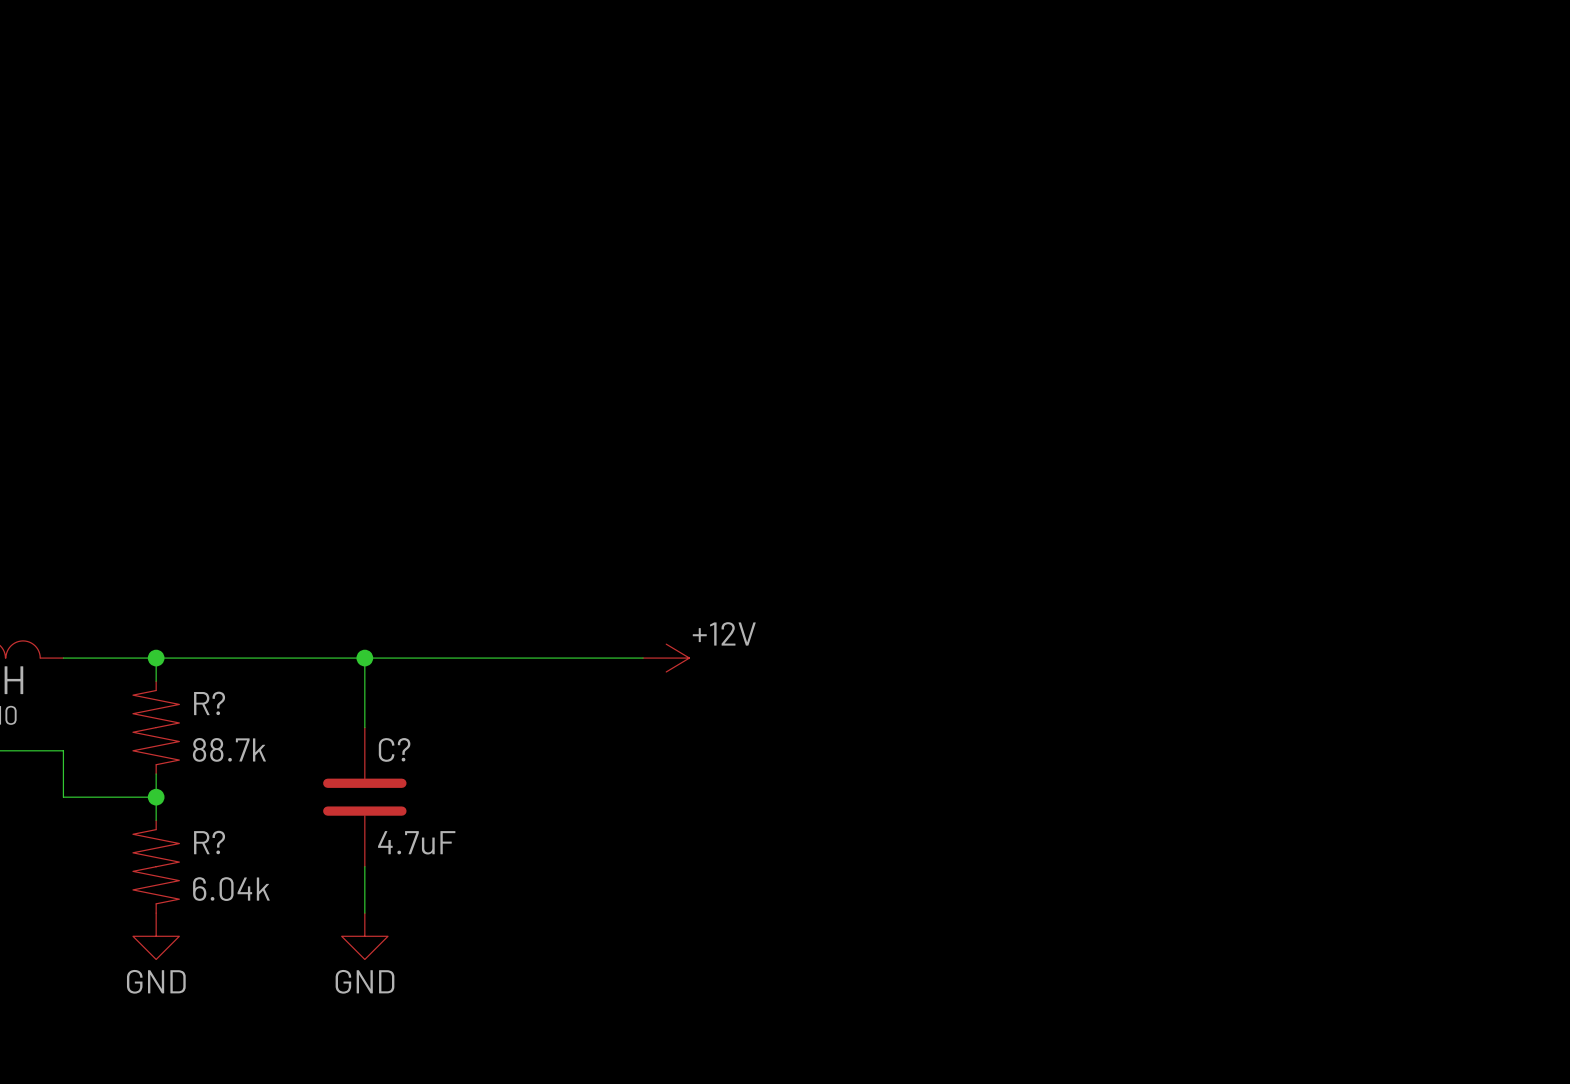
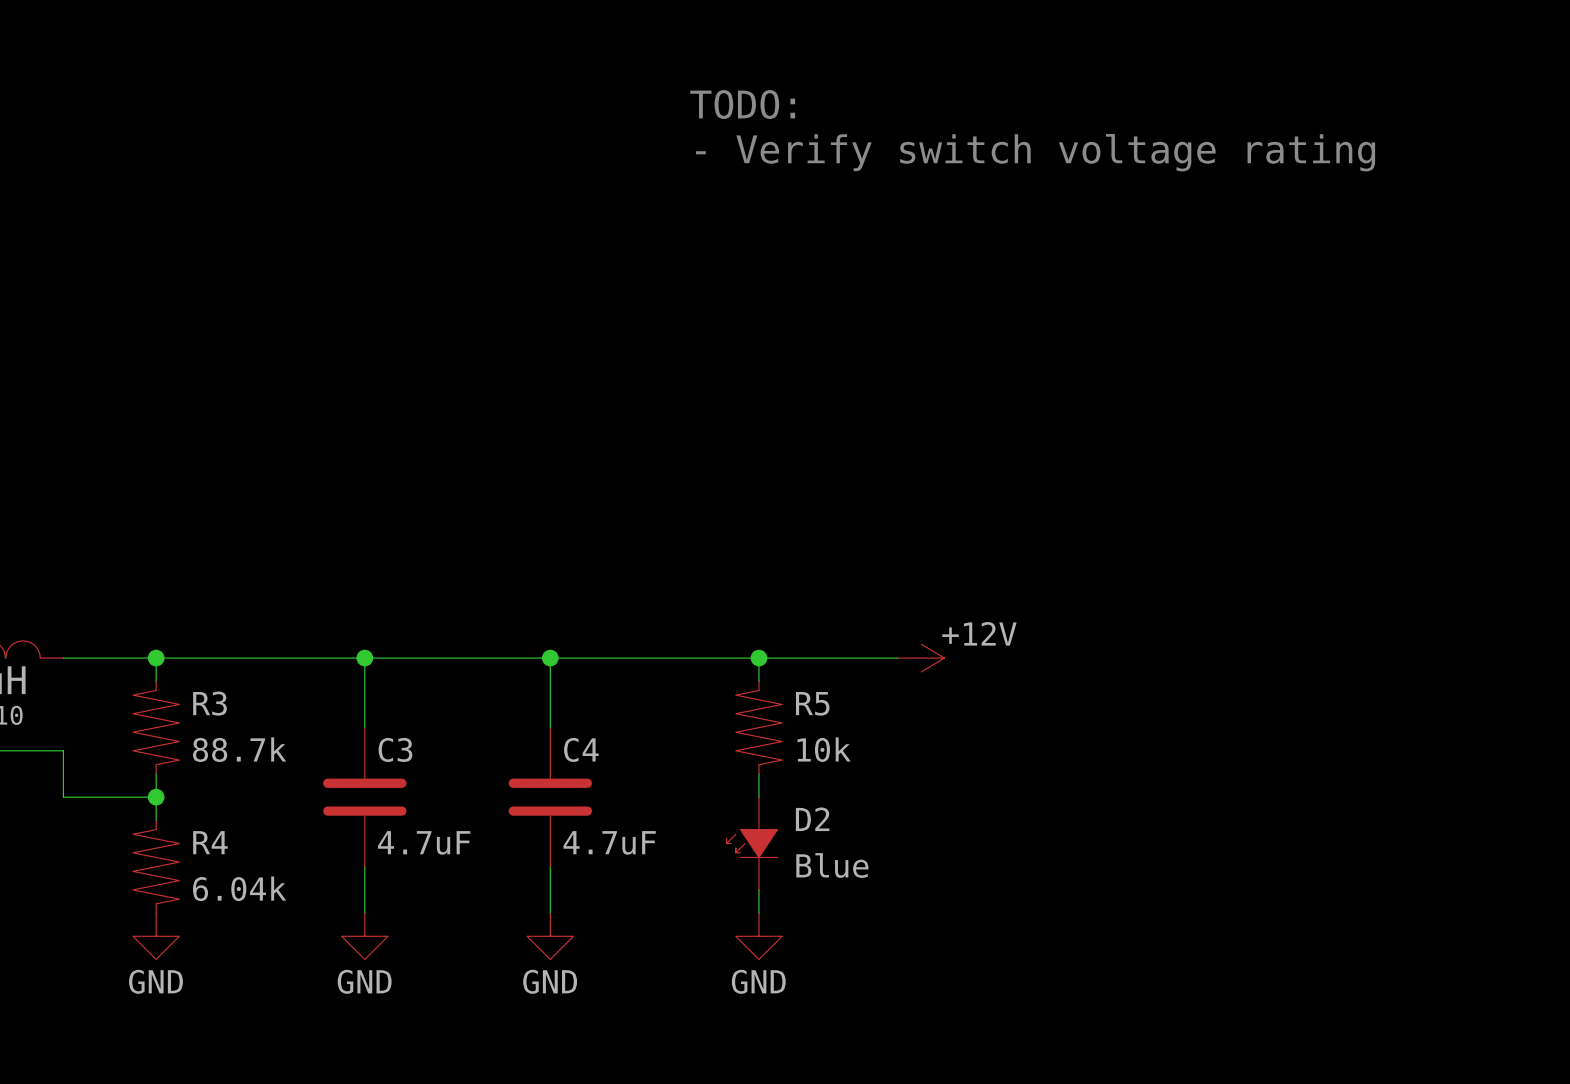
text: none -> TODO: (742, 104)
text: none -> - Verify switch voltage rating (1035, 152)
wire: none -> (550, 658) (550, 727)
junction: none -> (550, 658)
wire: none -> (643, 658) (898, 658)
power symbol position: +12V (666, 658) -> +12V (921, 658)
wire: none -> (758, 658) (758, 681)
junction: none -> (758, 658)
R? name: R? (209, 703) -> R3 (210, 703)
R5: none -> 10k (758, 727)
C? name: C? (394, 749) -> C3 (395, 749)
wire: none -> (758, 773) (758, 797)
C4: none -> 4.7uF (550, 797)
R? name: R? (209, 842) -> R4 (210, 842)
D2: none -> Blue (752, 843)
wire: none -> (550, 866) (550, 913)
wire: none -> (758, 889) (758, 913)
power symbol: none -> GND (550, 936)
power symbol: none -> GND (758, 936)

